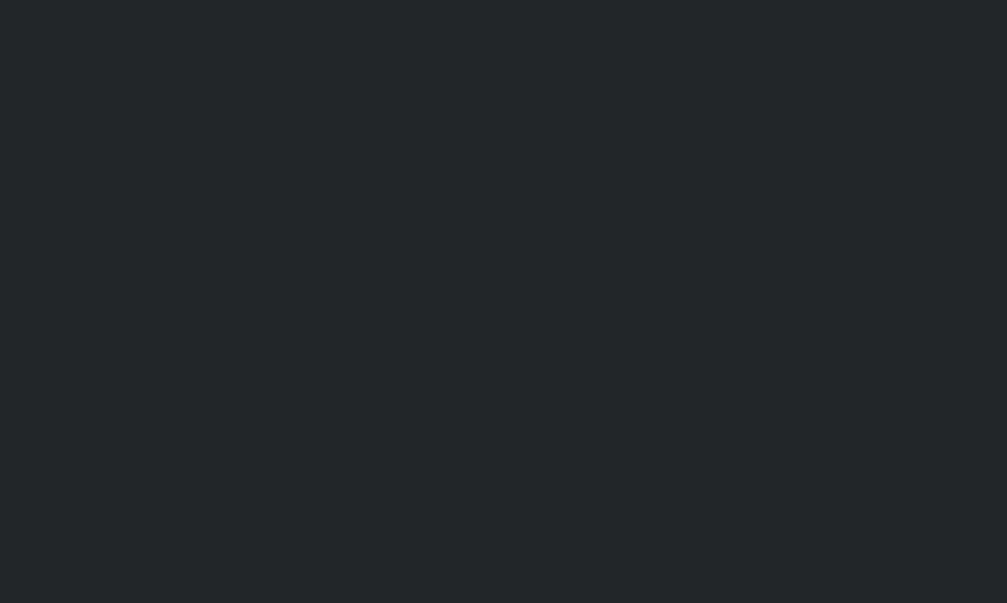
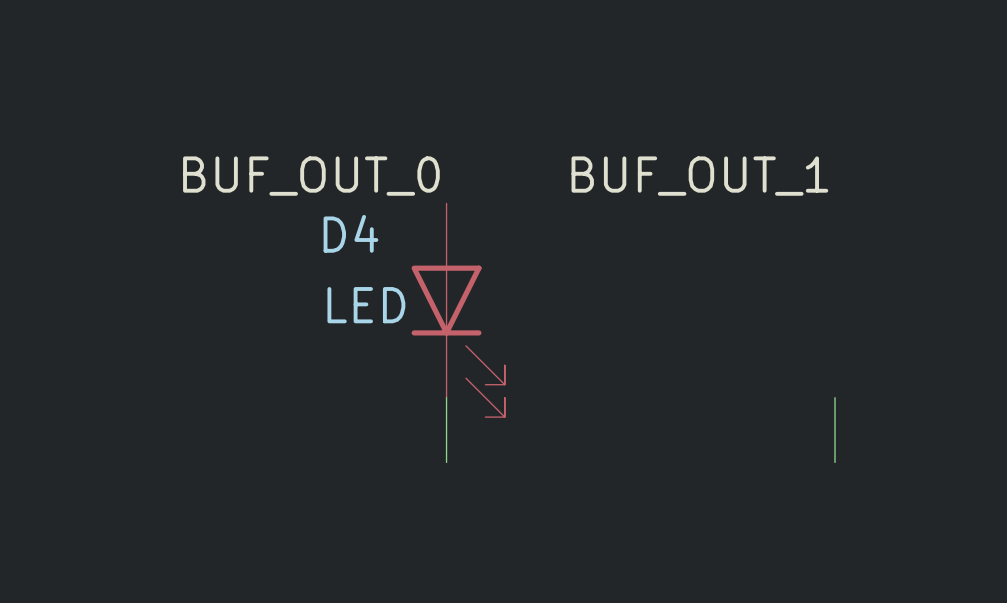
label: none -> BUF_OUT_0 (311, 176)
label: none -> BUF_OUT_1 (699, 176)
D4: none -> LED (458, 310)
wire: none -> (446, 397) (446, 462)
wire: none -> (835, 397) (835, 462)

